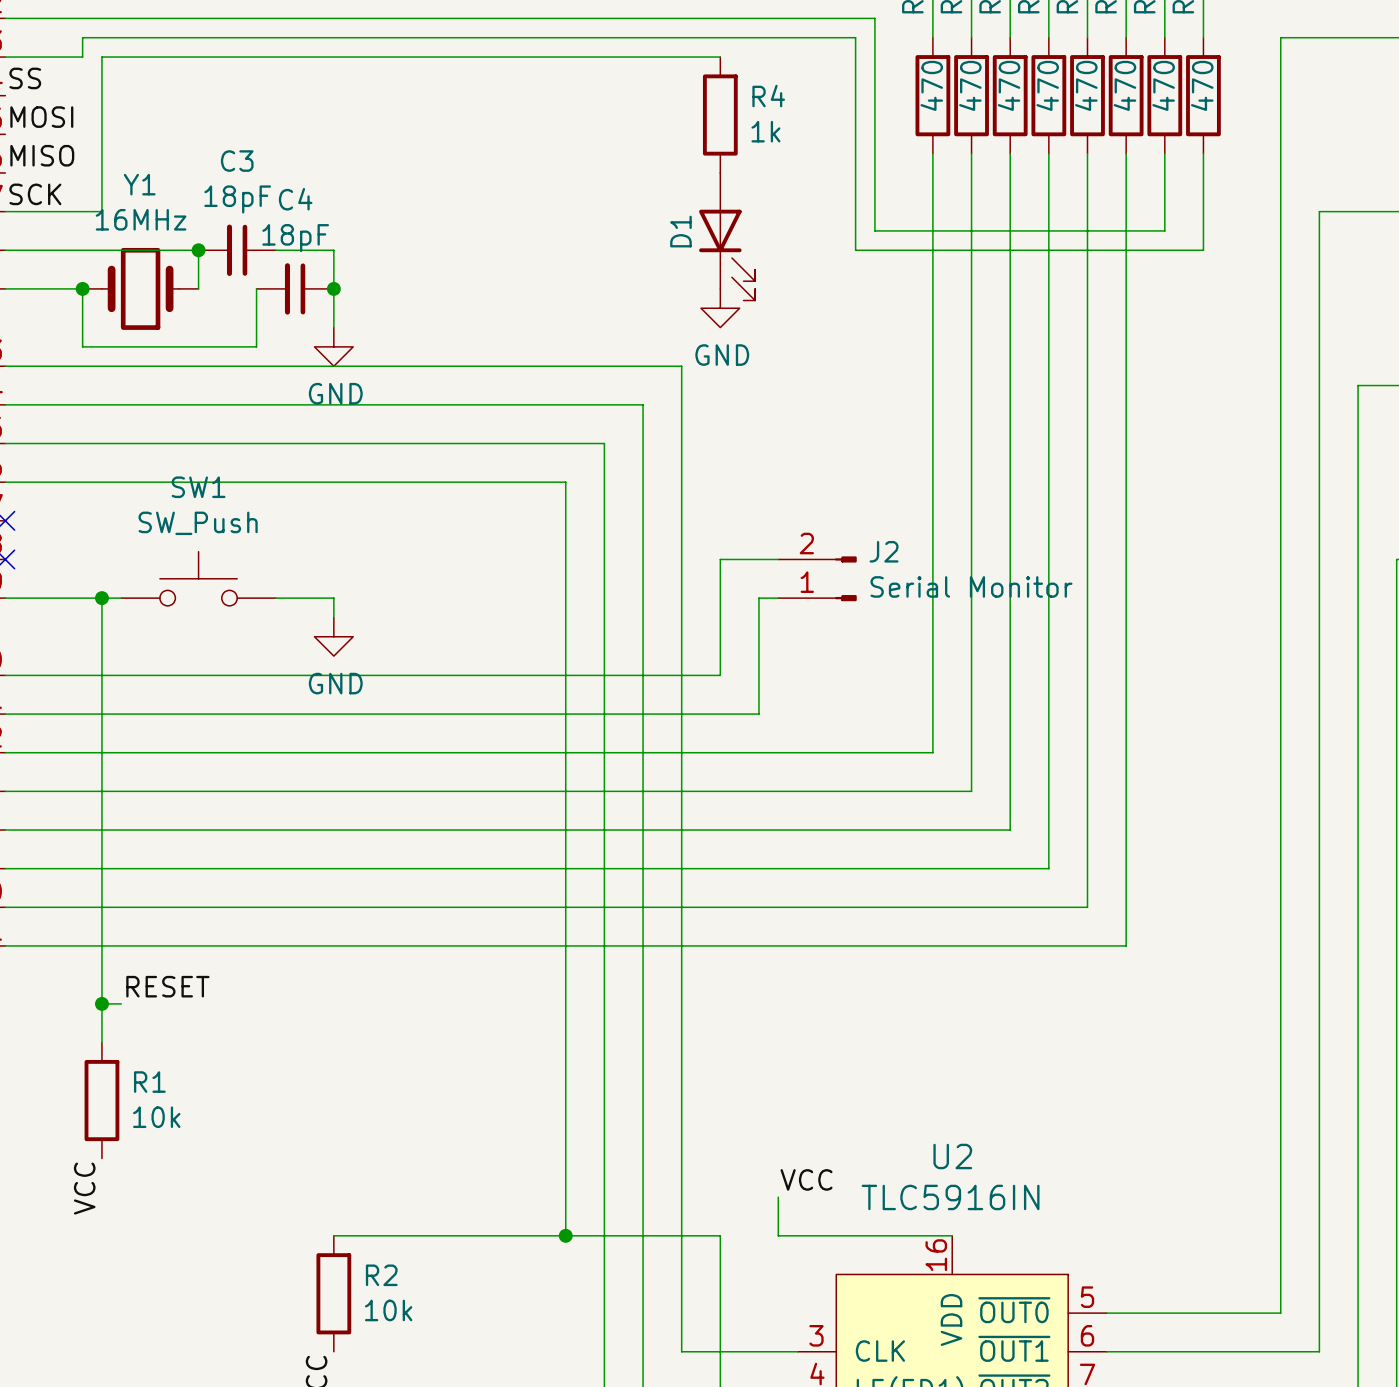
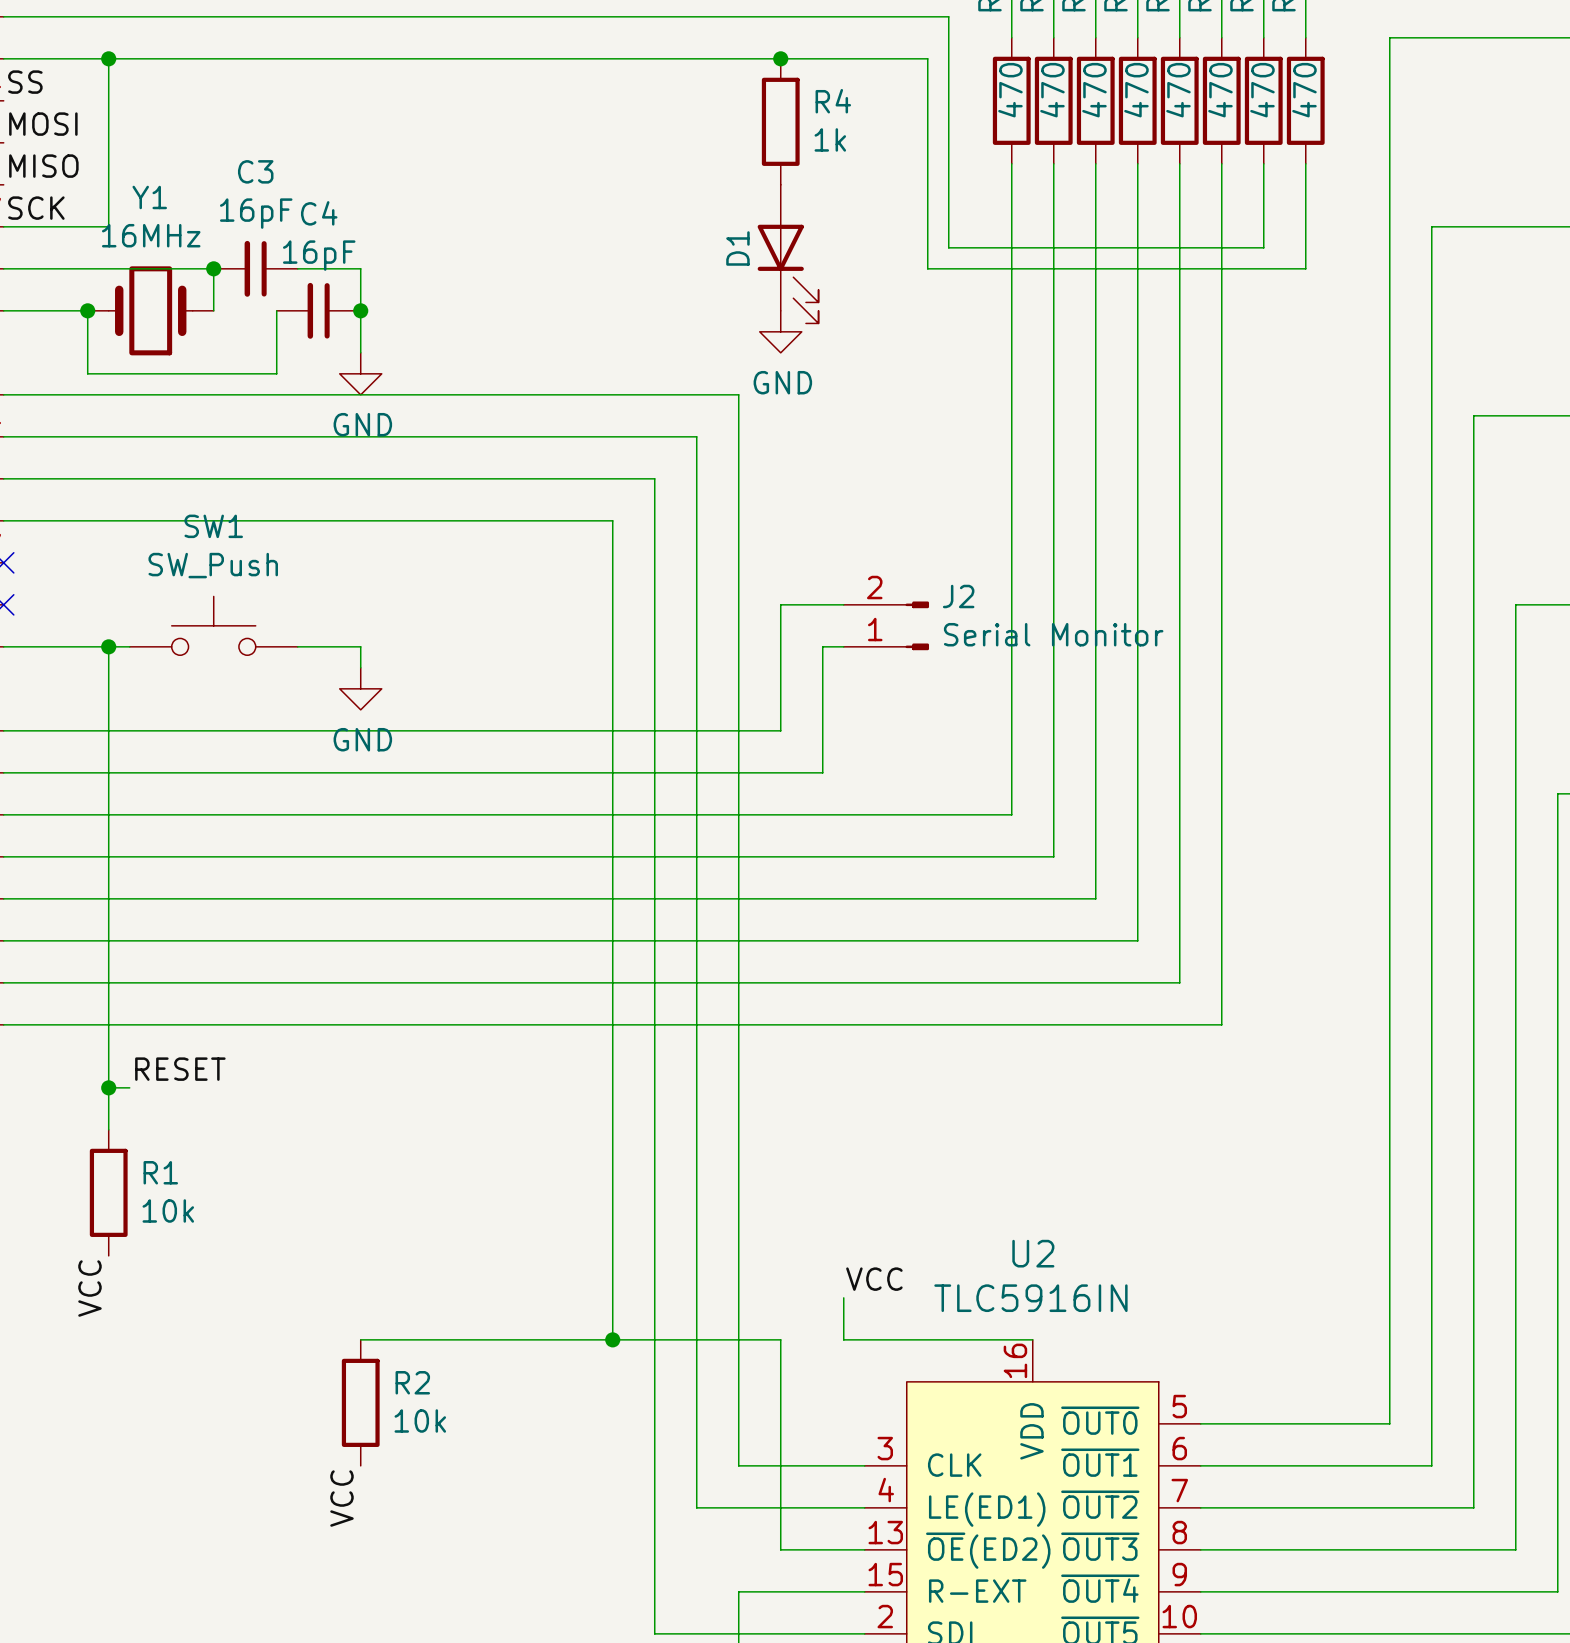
wire: (82, 57) (82, 37) (855, 37) (855, 57) -> (780, 58) (927, 58)
wire: none -> (87, 58) (108, 58)
junction: none -> (108, 58)
junction: none -> (780, 58)
C3 value: 18pF (237, 199) -> 16pF (256, 213)
C4 value: 18pF (295, 238) -> 16pF (319, 255)

